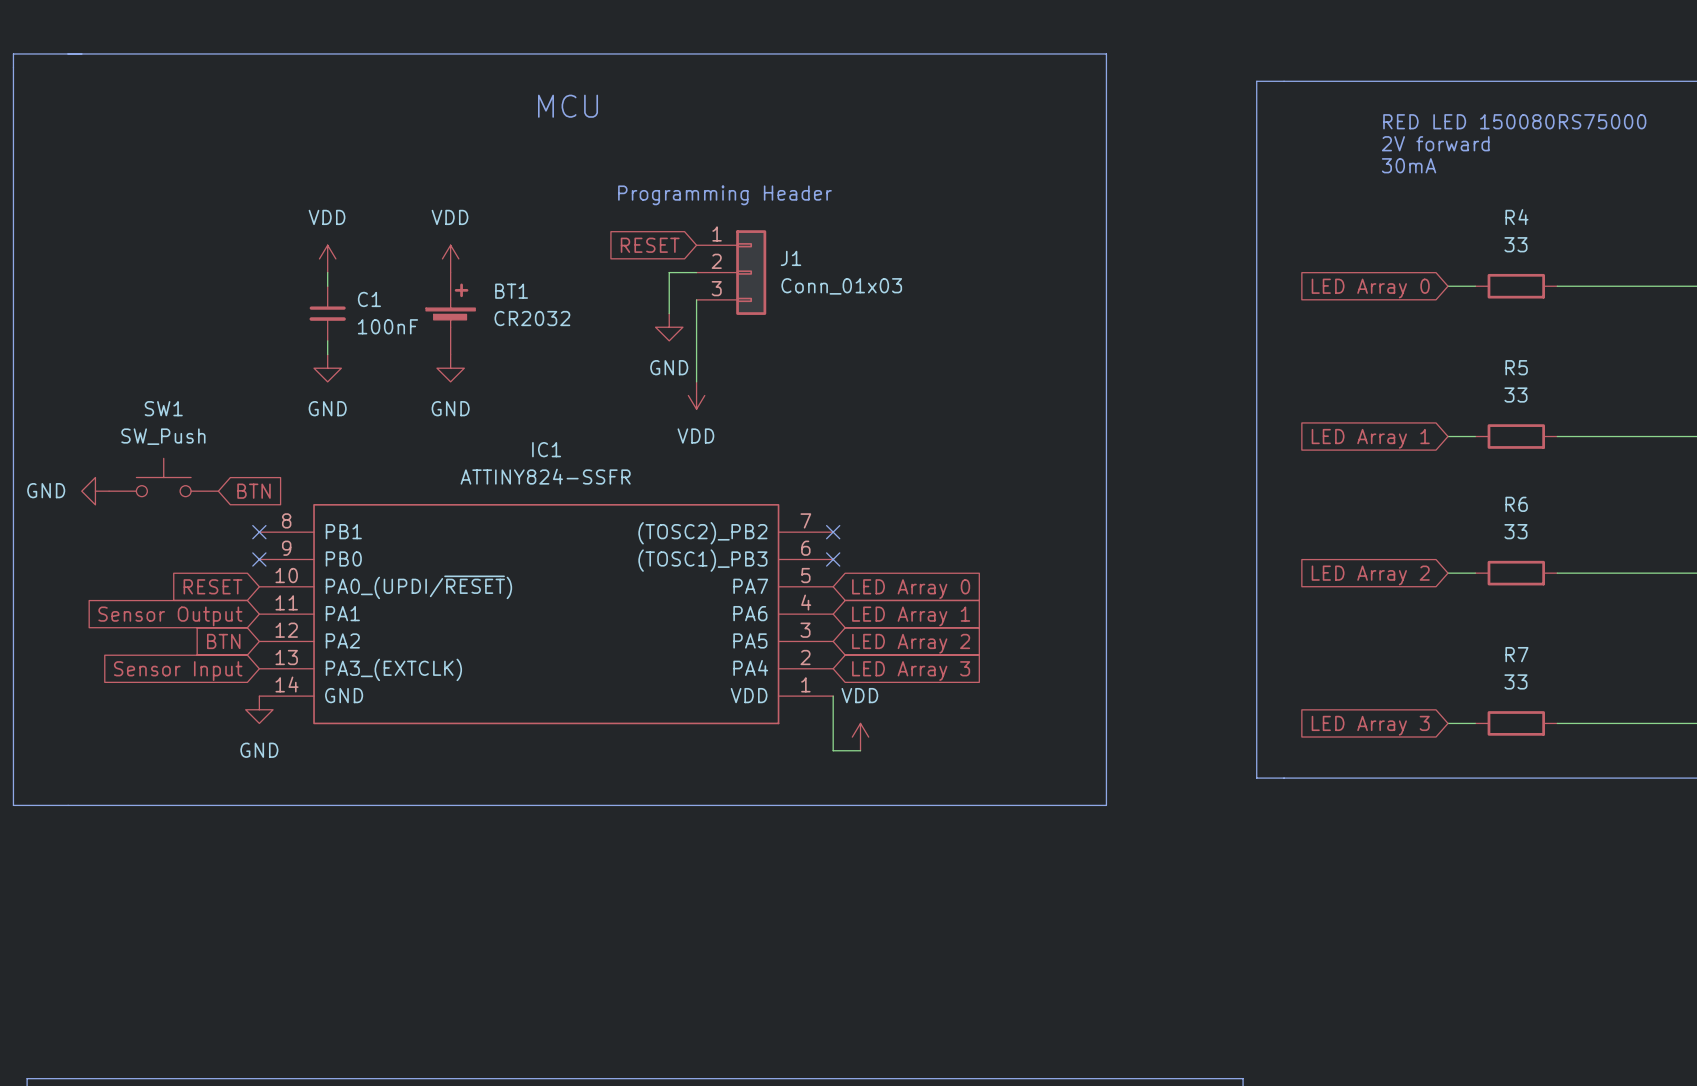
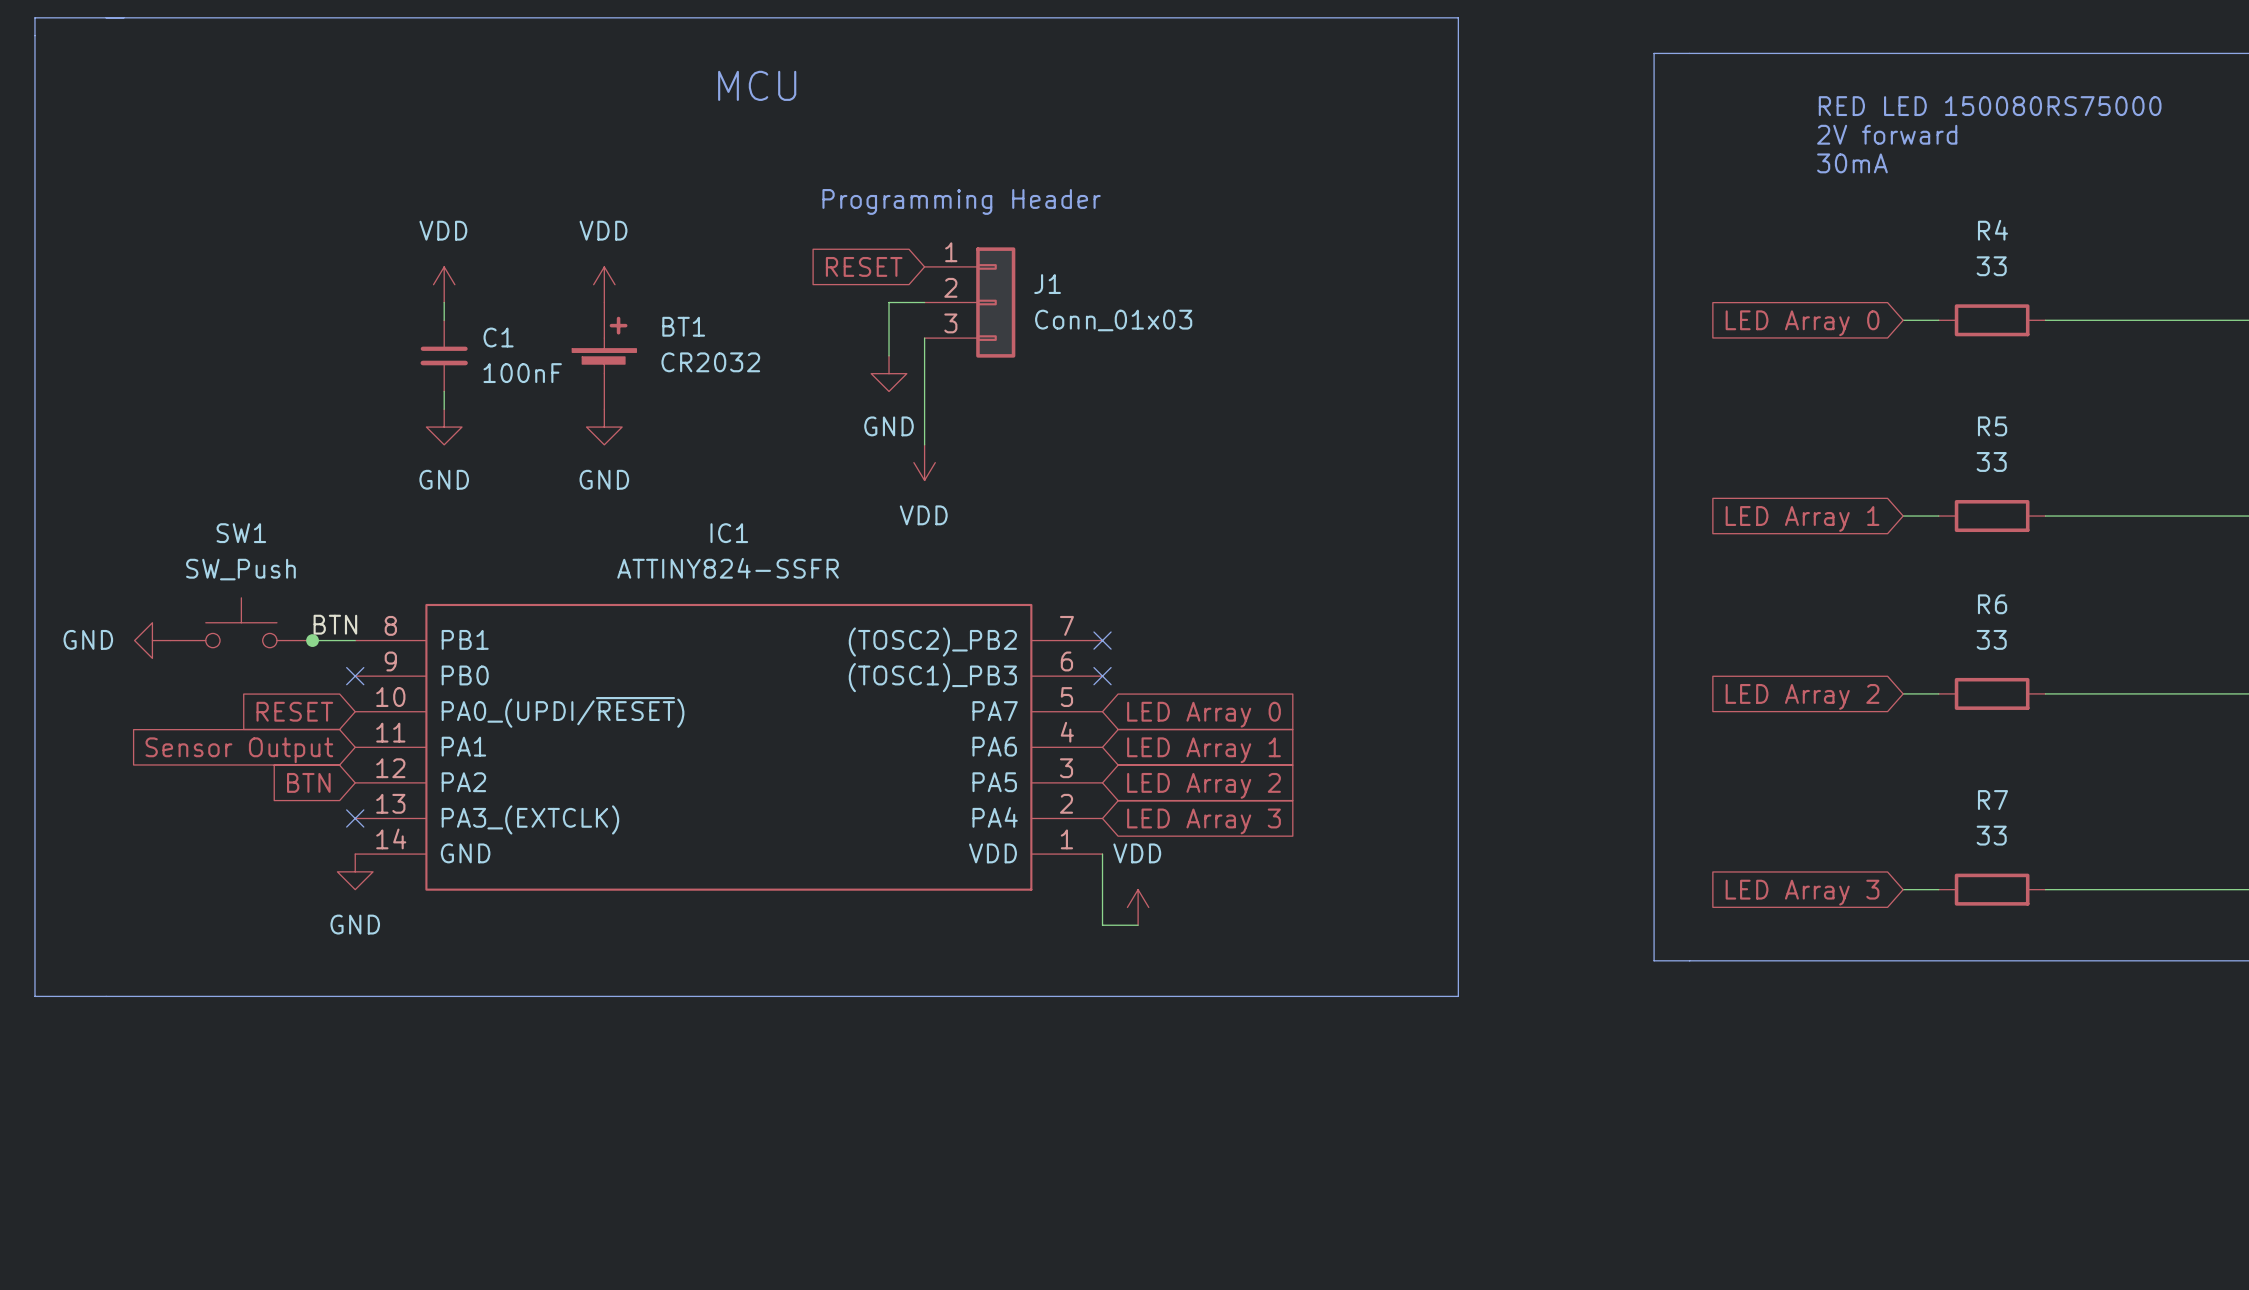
SW1 position: (163, 477) -> (241, 622)
power symbol position: GND (95, 491) -> GND (152, 640)
global label: BTN (254, 491) -> none
label: none -> BTN (335, 624)
wire: none -> (308, 640) (355, 640)
junction: none -> (312, 640)
no-connect mark: (259, 532) -> none
no-connect mark: none -> (355, 818)
global label: Sensor Input (178, 671) -> none

